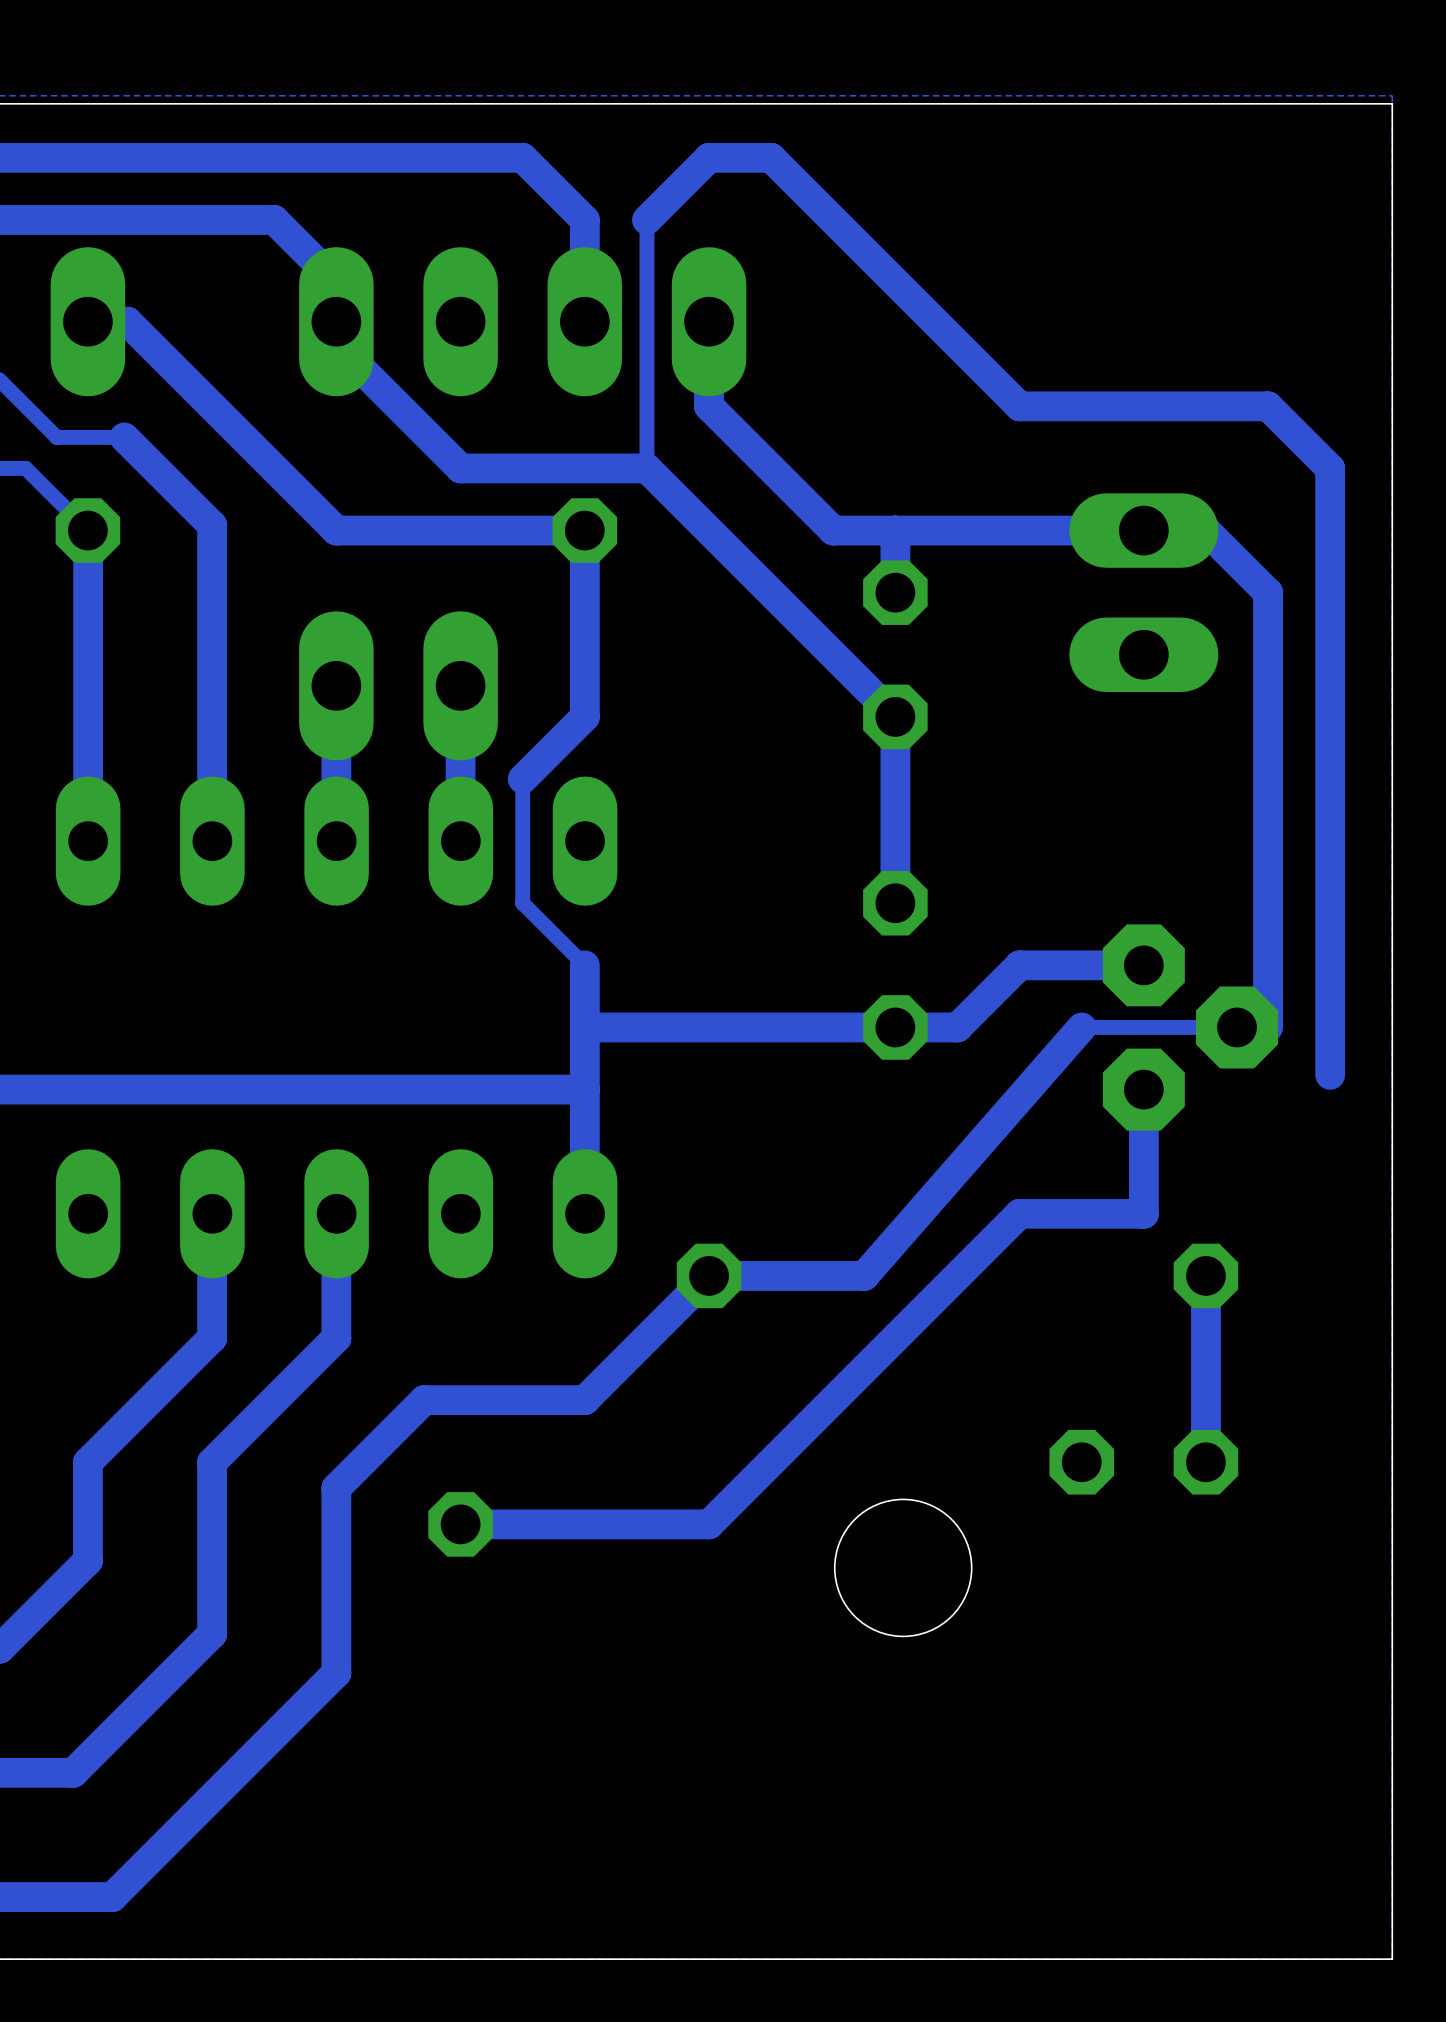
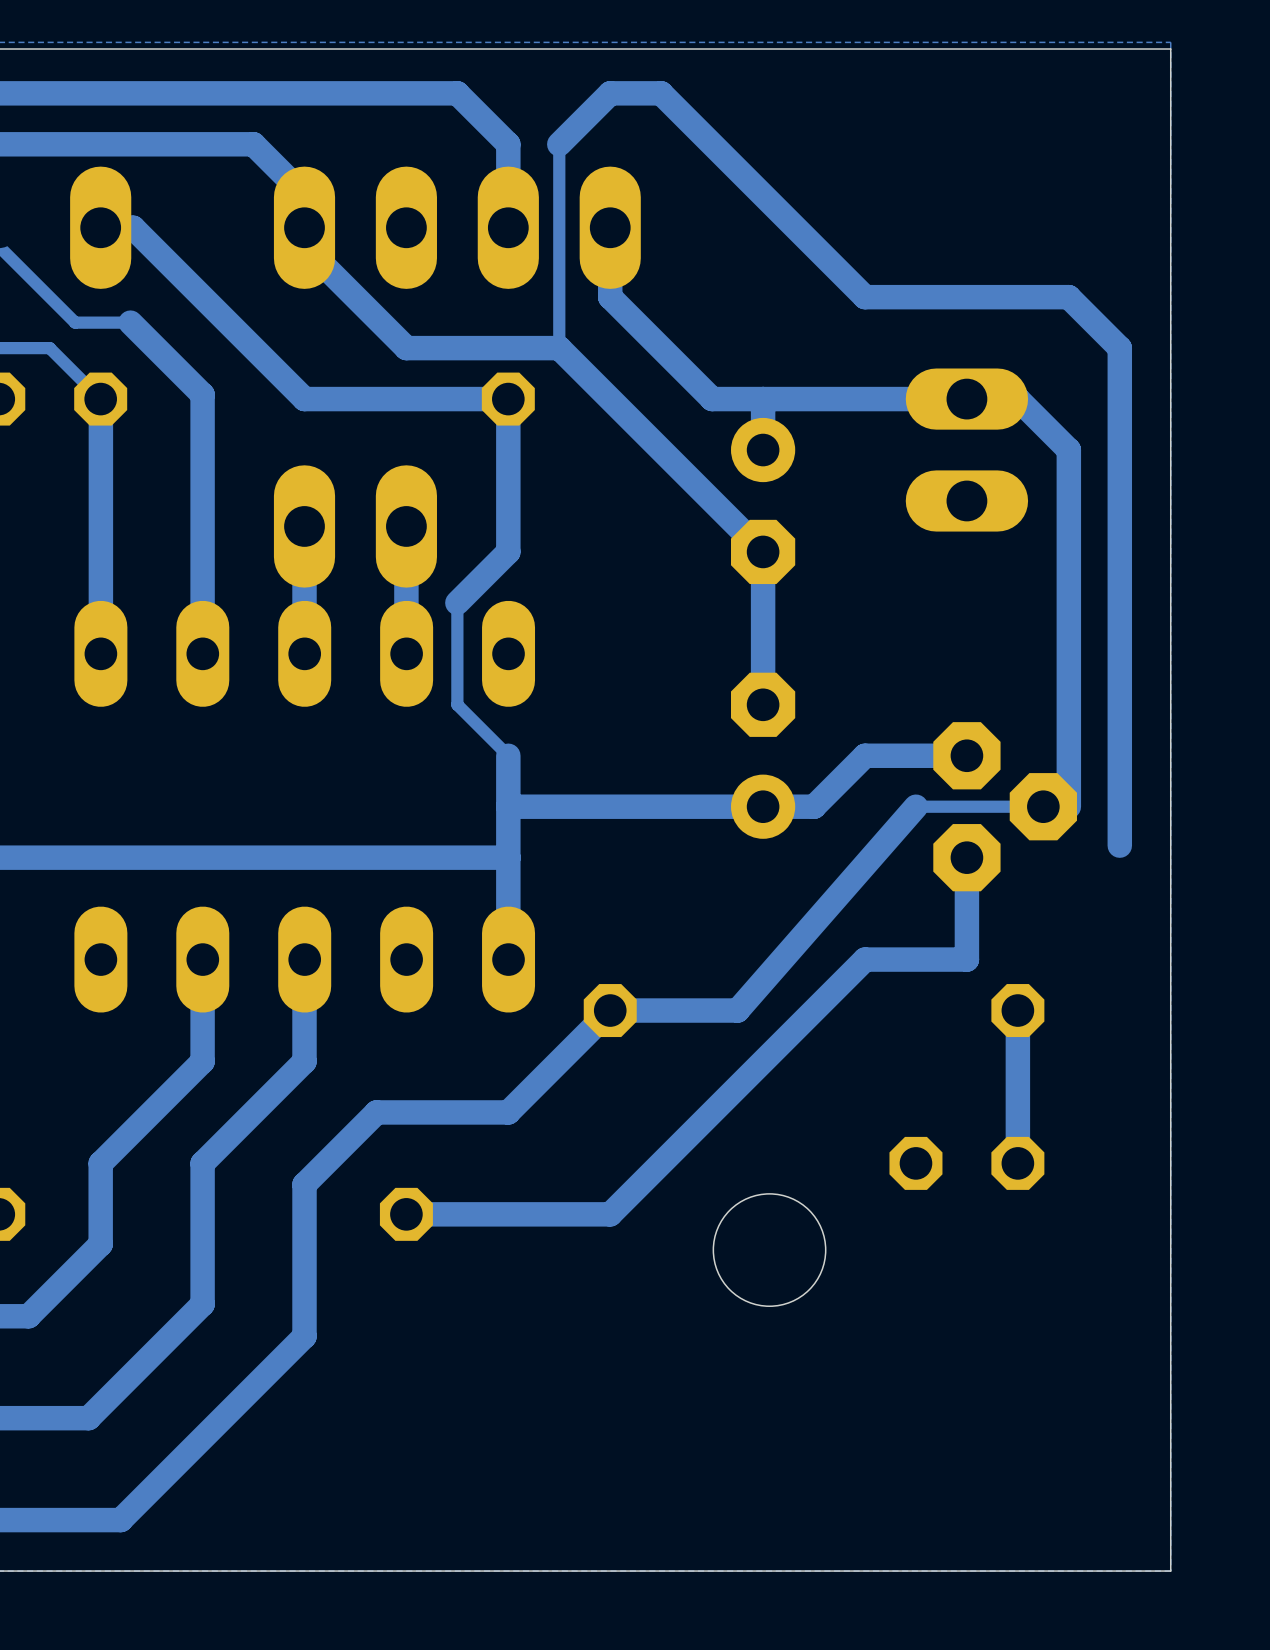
part footprint: [863, 560, 928, 750] -> [731, 417, 796, 585]
part footprint: [863, 870, 928, 1060] -> [731, 672, 796, 839]

